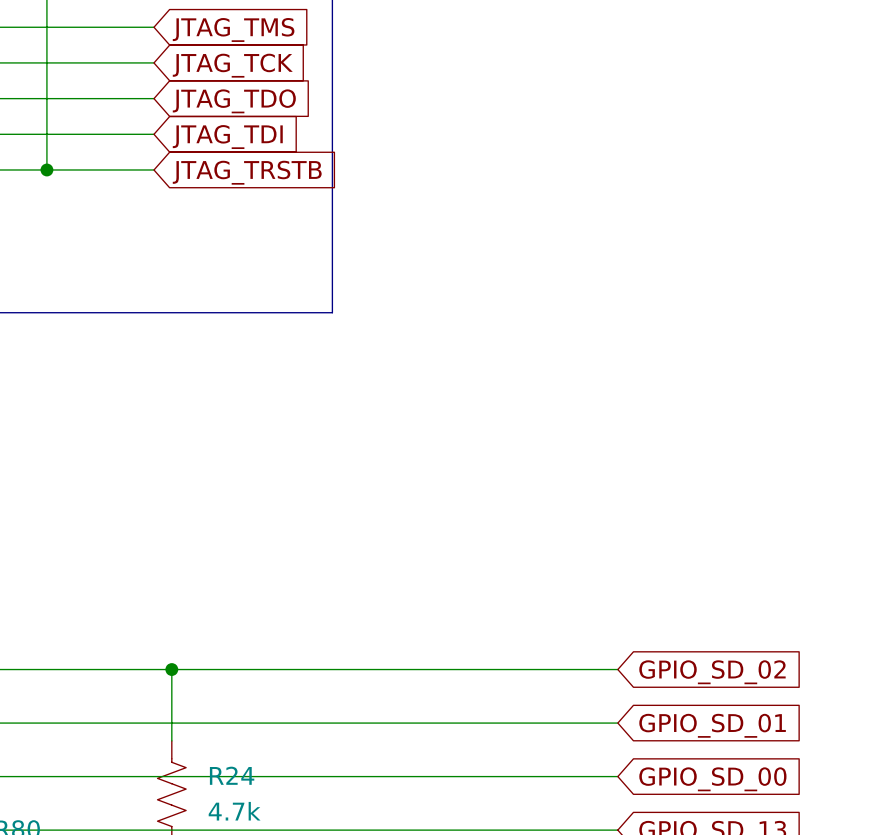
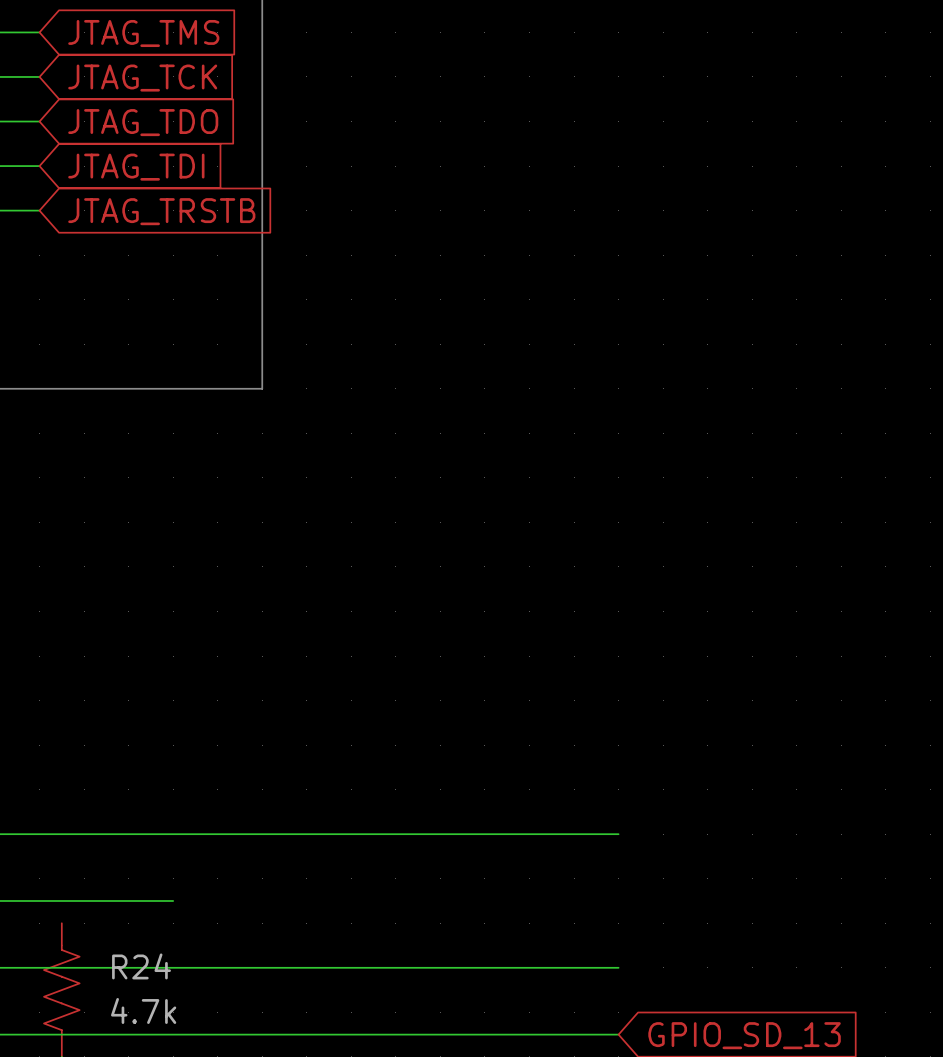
wire: (171, 669) (171, 740) -> none
junction: (171, 669) -> none
global label: GPIO_SD_02 (712, 672) -> none
wire: (261, 723) (617, 723) -> none
global label: GPIO_SD_01 (712, 725) -> none
global label: GPIO_SD_00 (712, 779) -> none

